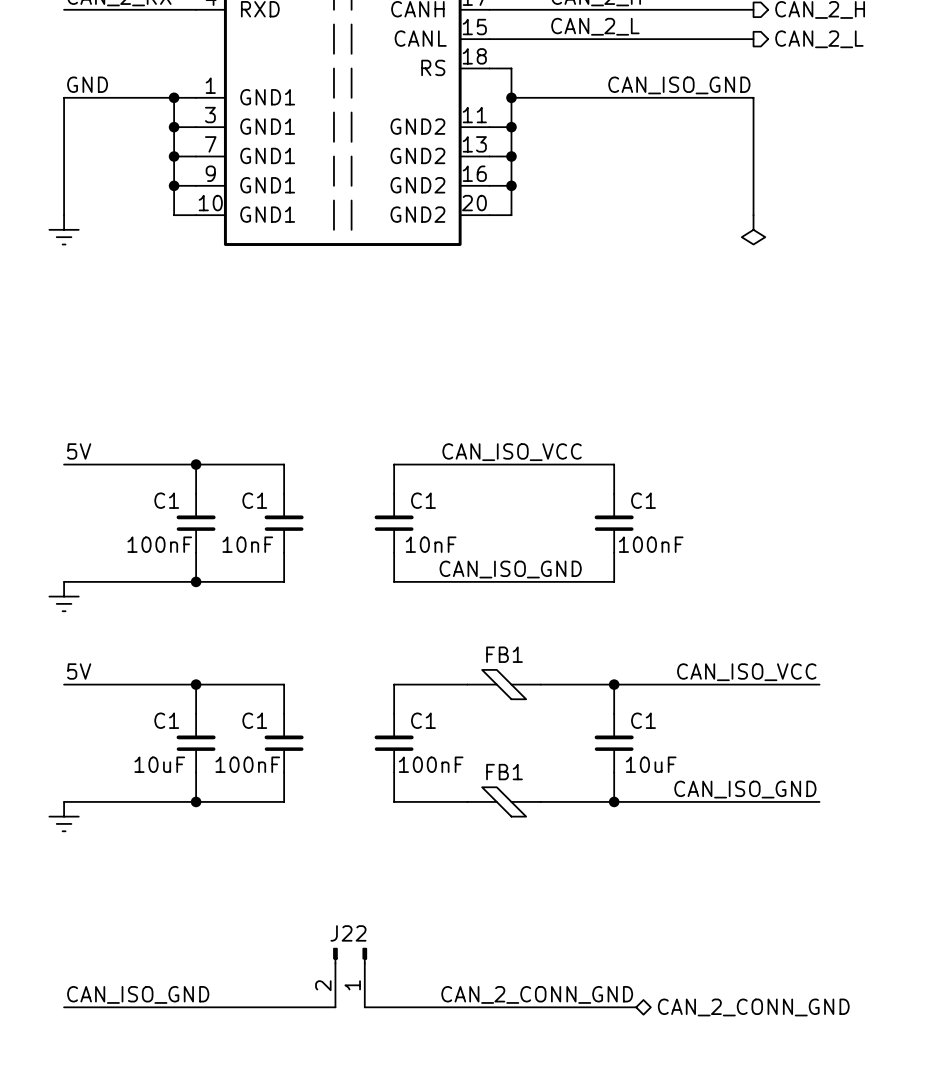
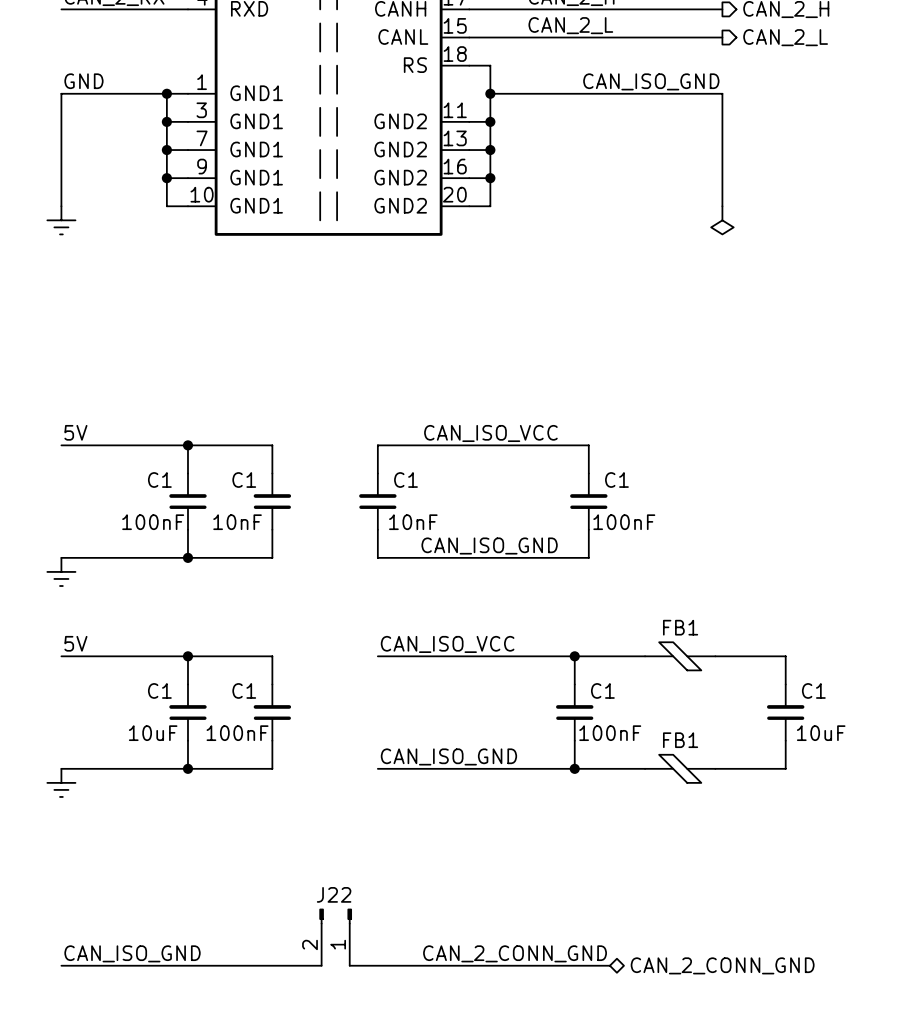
label: none -> CAN_ISO_VCC (447, 644)
label: CAN_ISO_VCC (746, 672) -> none
wire: (394, 684) (394, 713) -> (574, 656) (574, 684)
FB1: (504, 684) -> none
wire: (614, 684) (614, 713) -> (785, 656) (785, 684)
junction position: (614, 684) -> (574, 656)
FB1: none -> (680, 656)
C1 position: (394, 743) -> (574, 712)
C1 position: (614, 743) -> (785, 712)
wire: (394, 772) (394, 801) -> (574, 740) (574, 768)
wire: (614, 772) (614, 801) -> (785, 740) (785, 768)
label: none -> CAN_ISO_GND (448, 756)
label: CAN_ISO_GND (745, 789) -> none
FB1: (504, 801) -> none
junction position: (614, 801) -> (574, 768)
FB1: none -> (680, 768)

